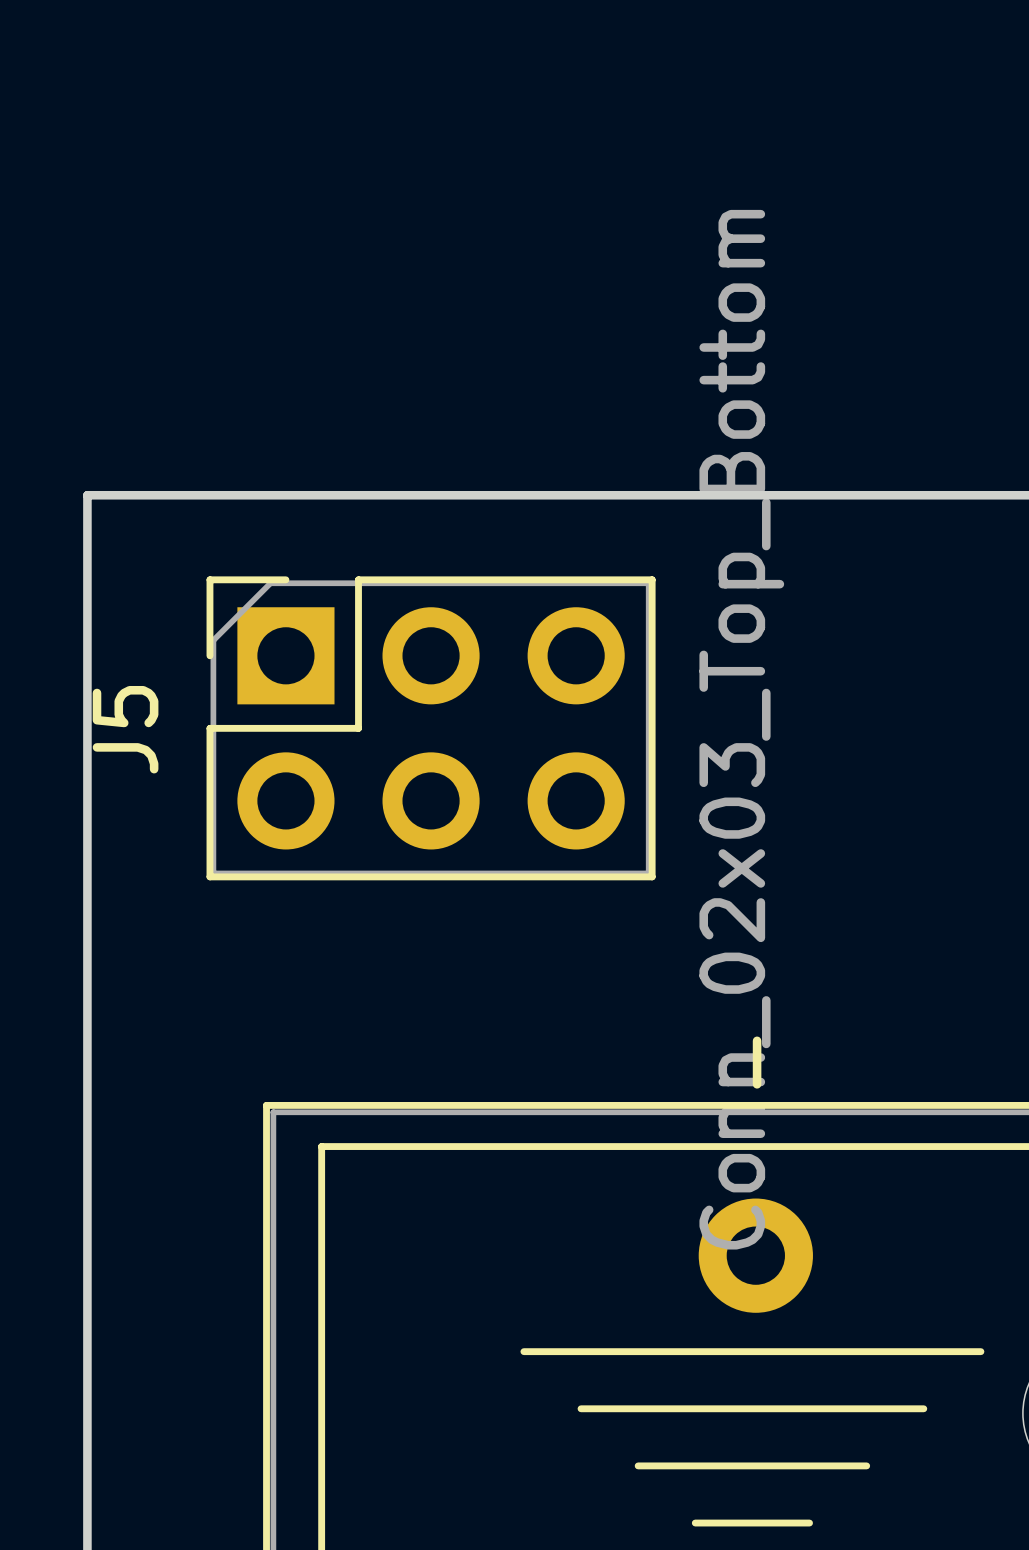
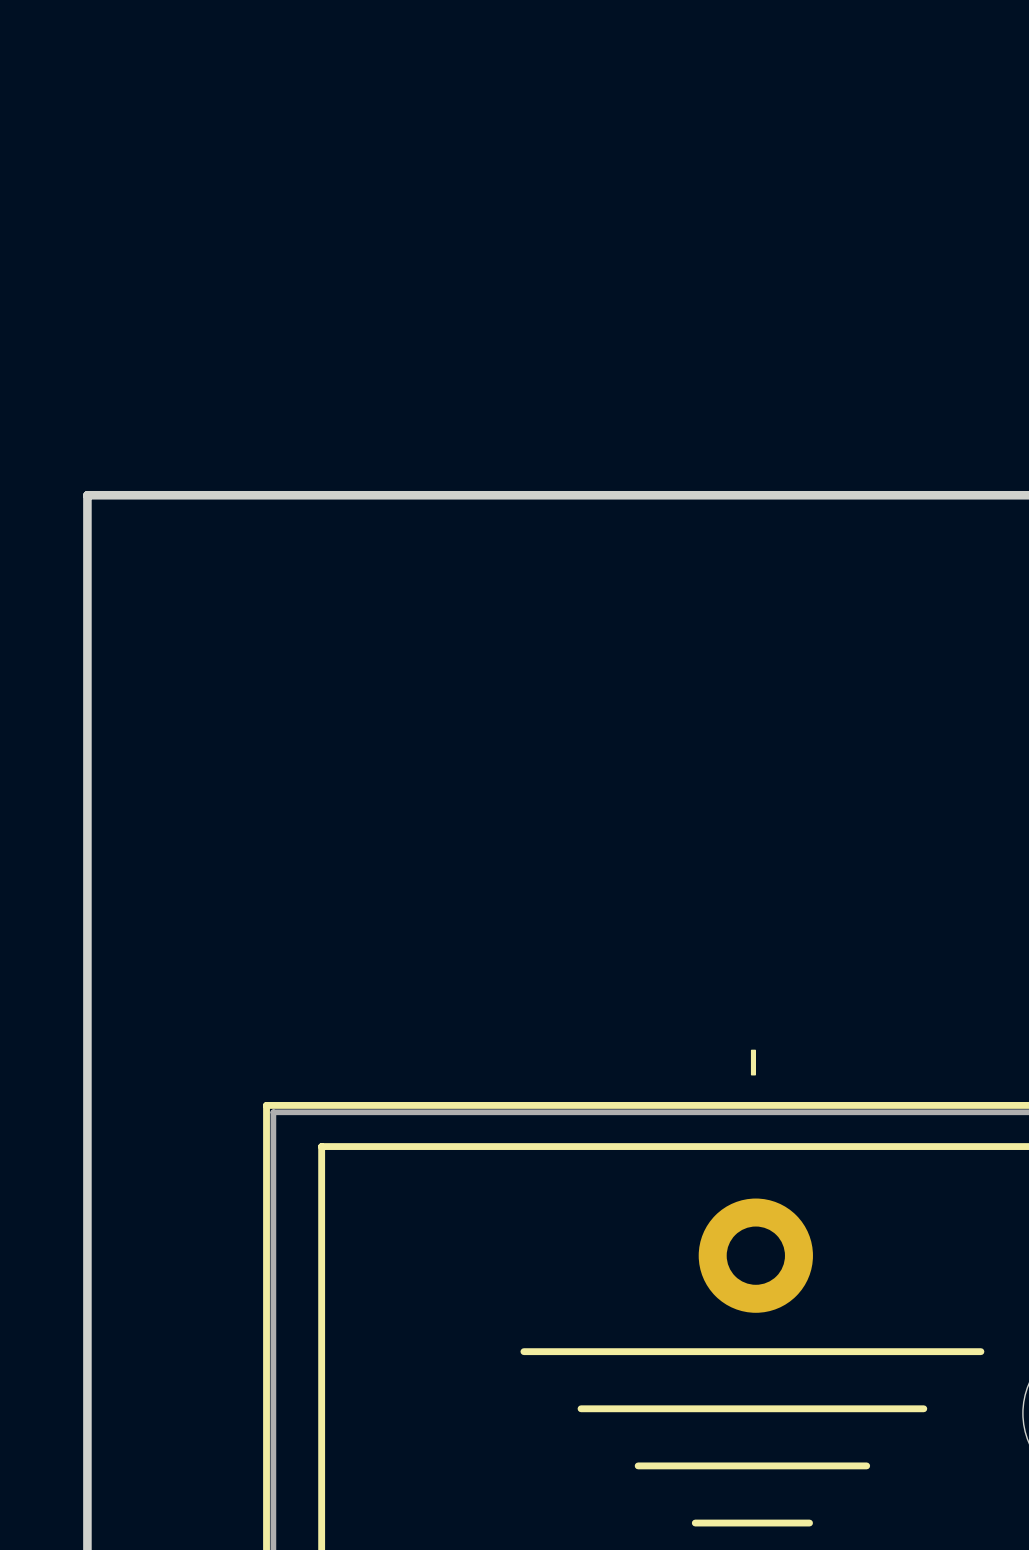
J5: Conn_02x03_Top_Bottom (431, 728) -> none

